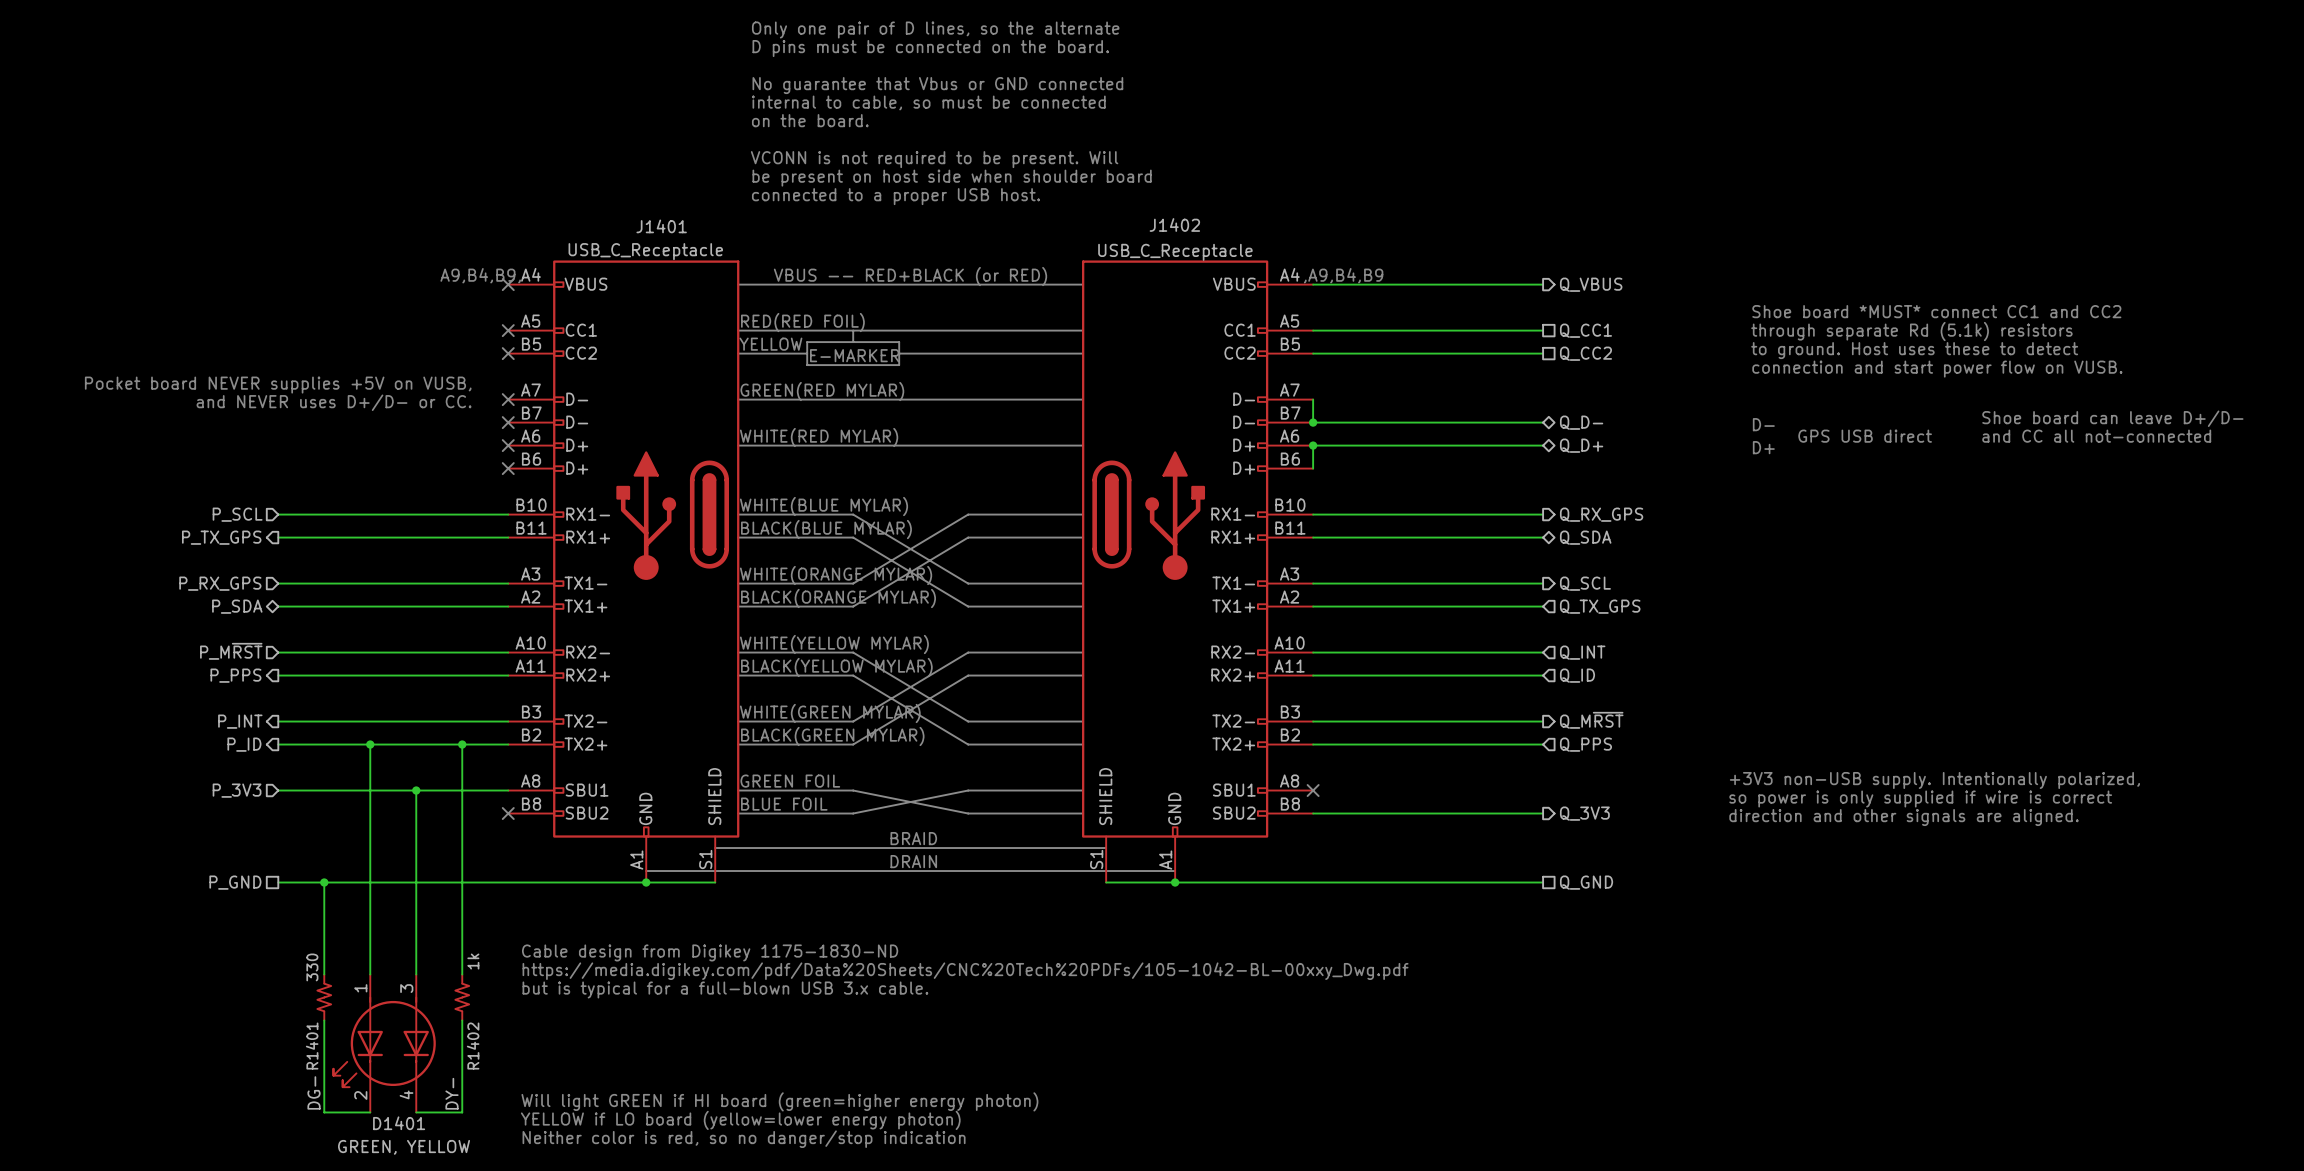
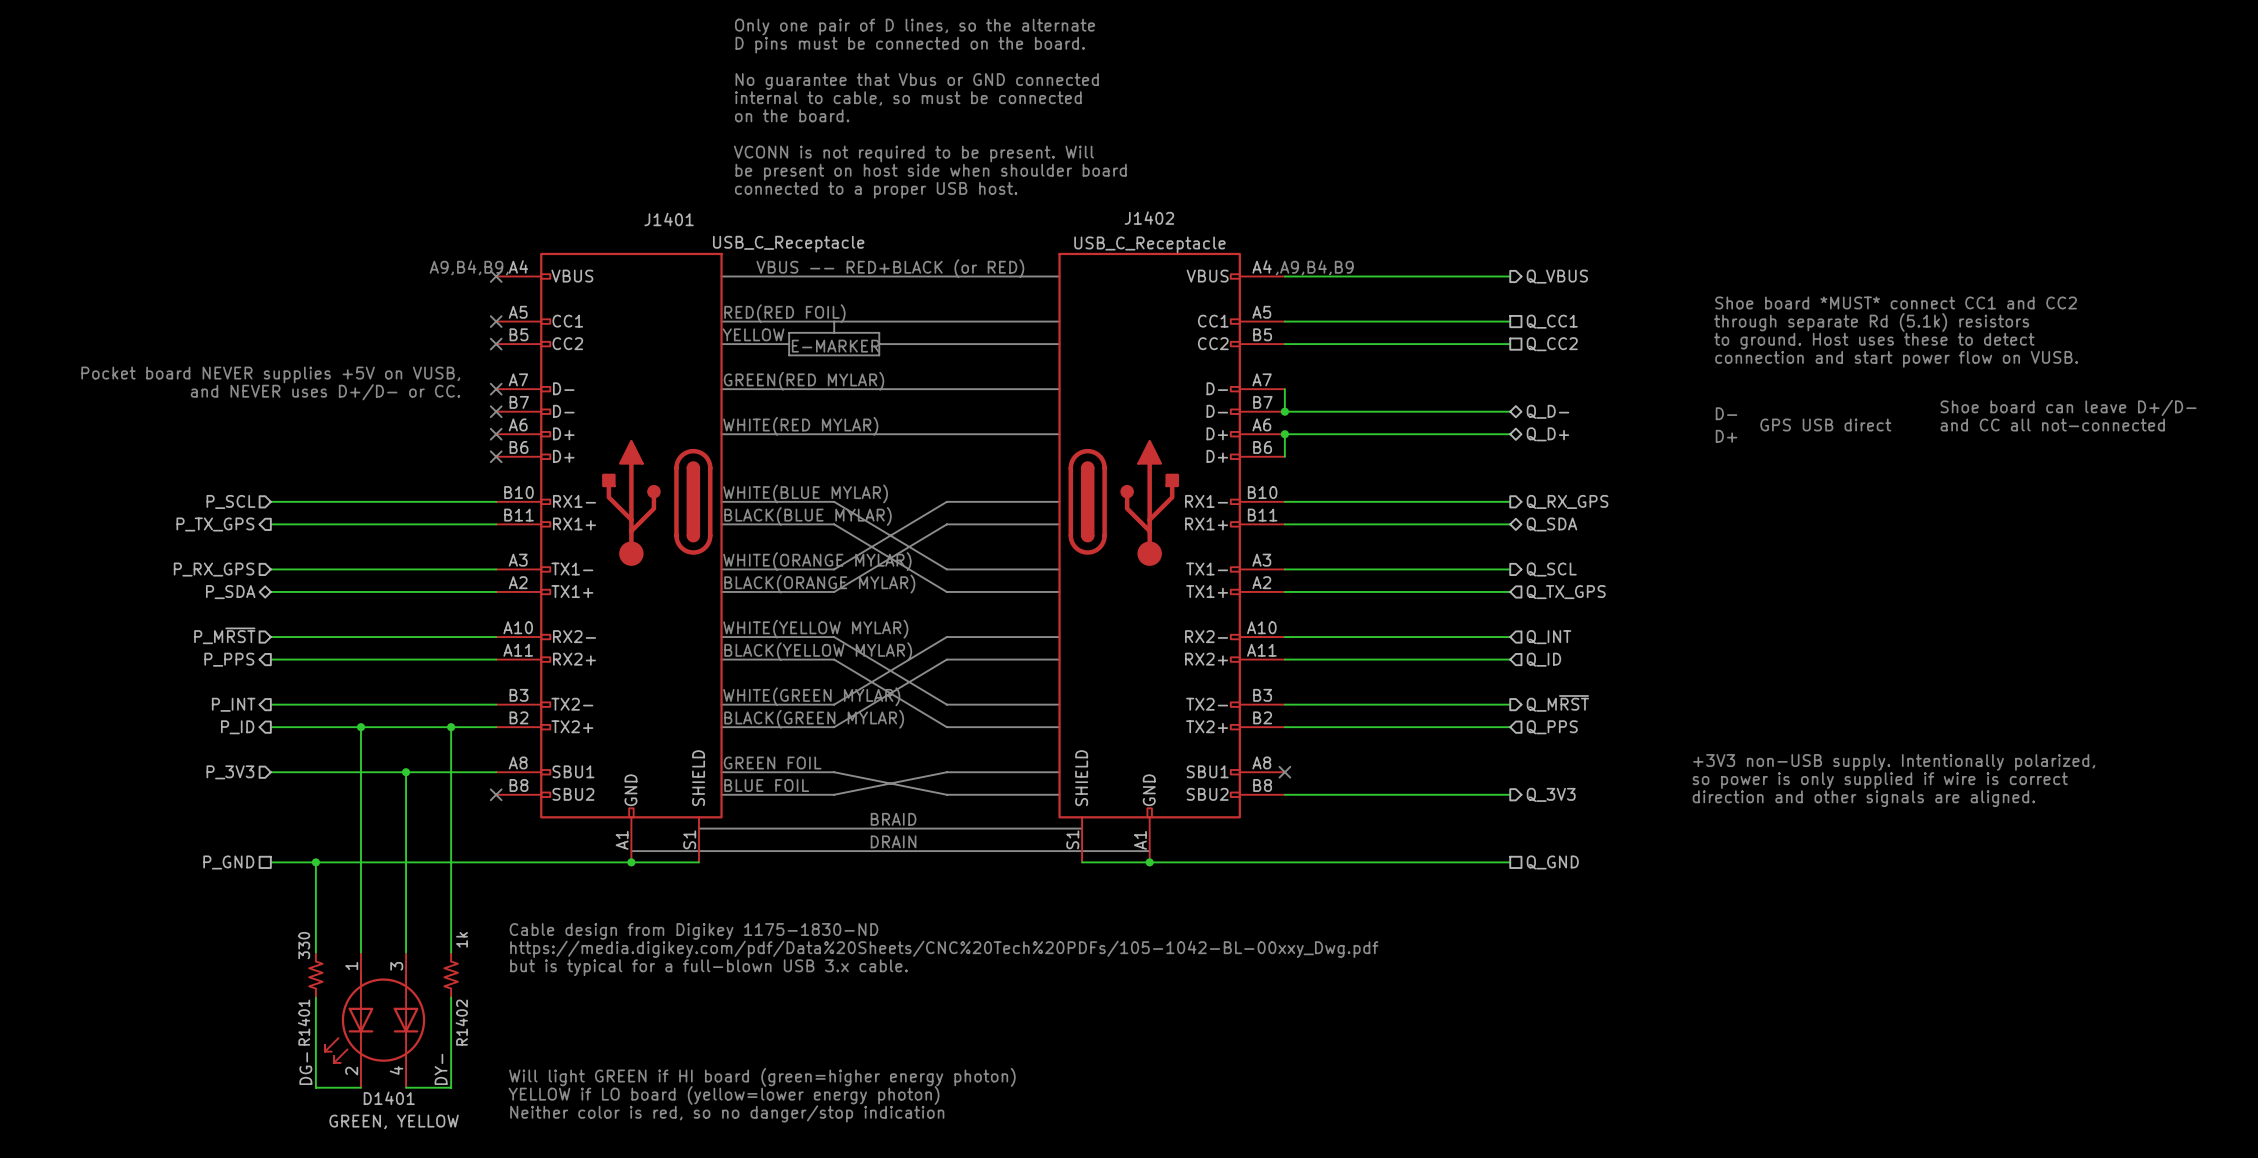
J1401 name position: J1401 (661, 226) -> J1401 (669, 219)
J1401 value position: USB_C_Receptacle (645, 251) -> USB_C_Receptacle (788, 244)

